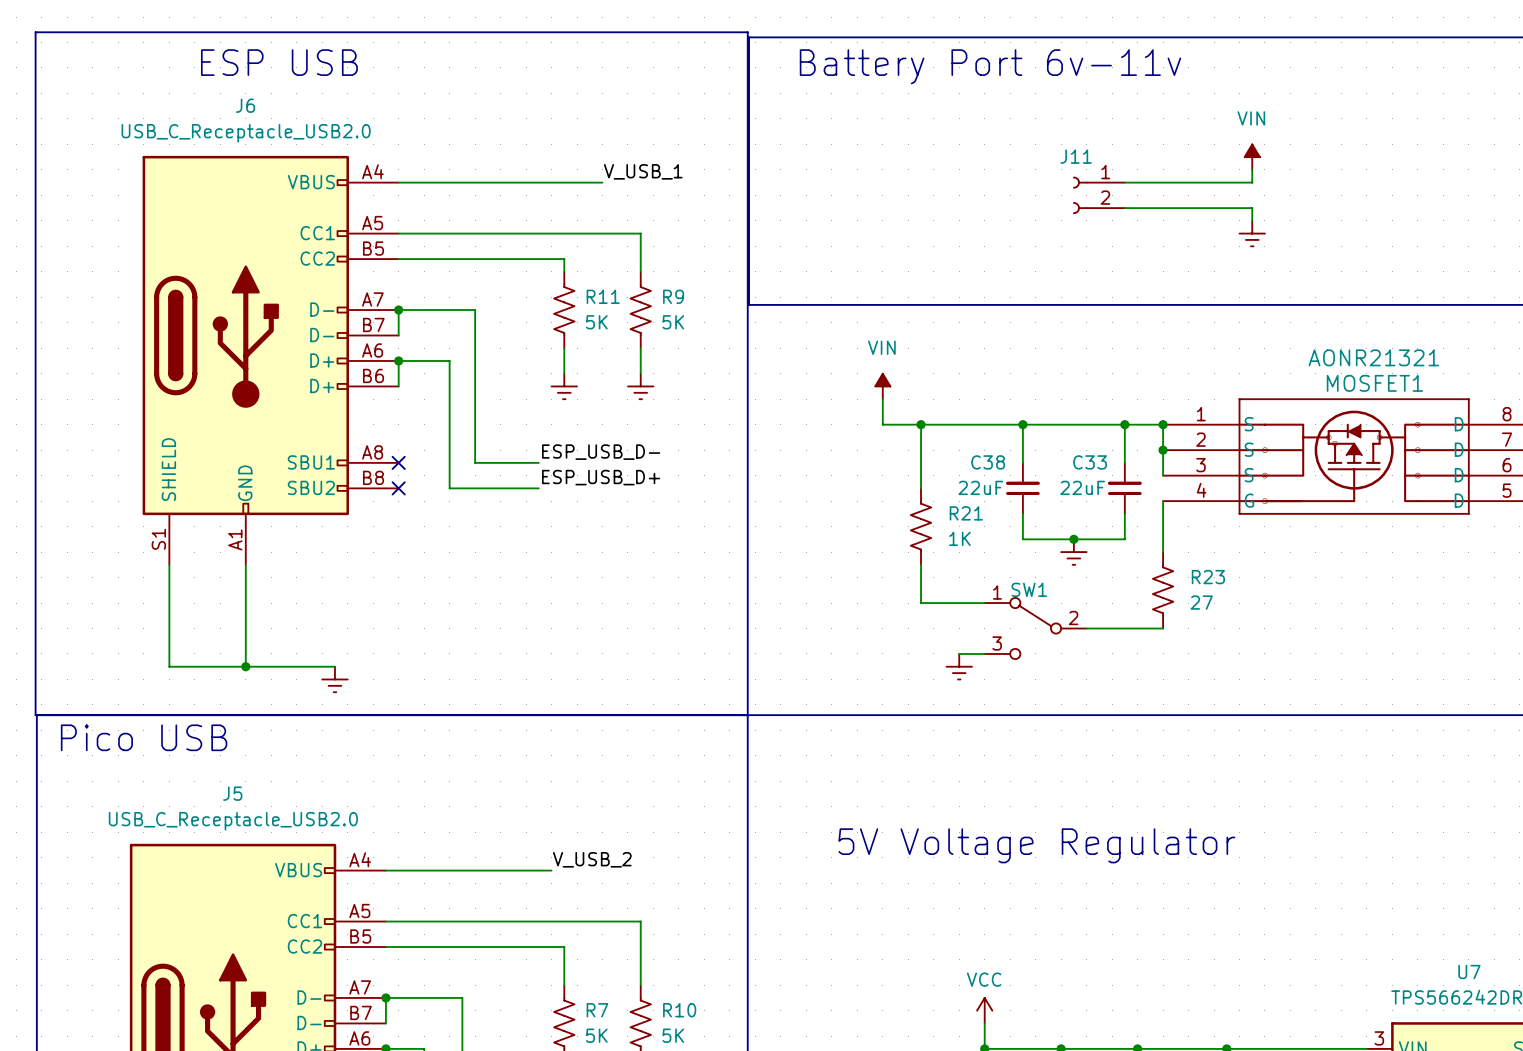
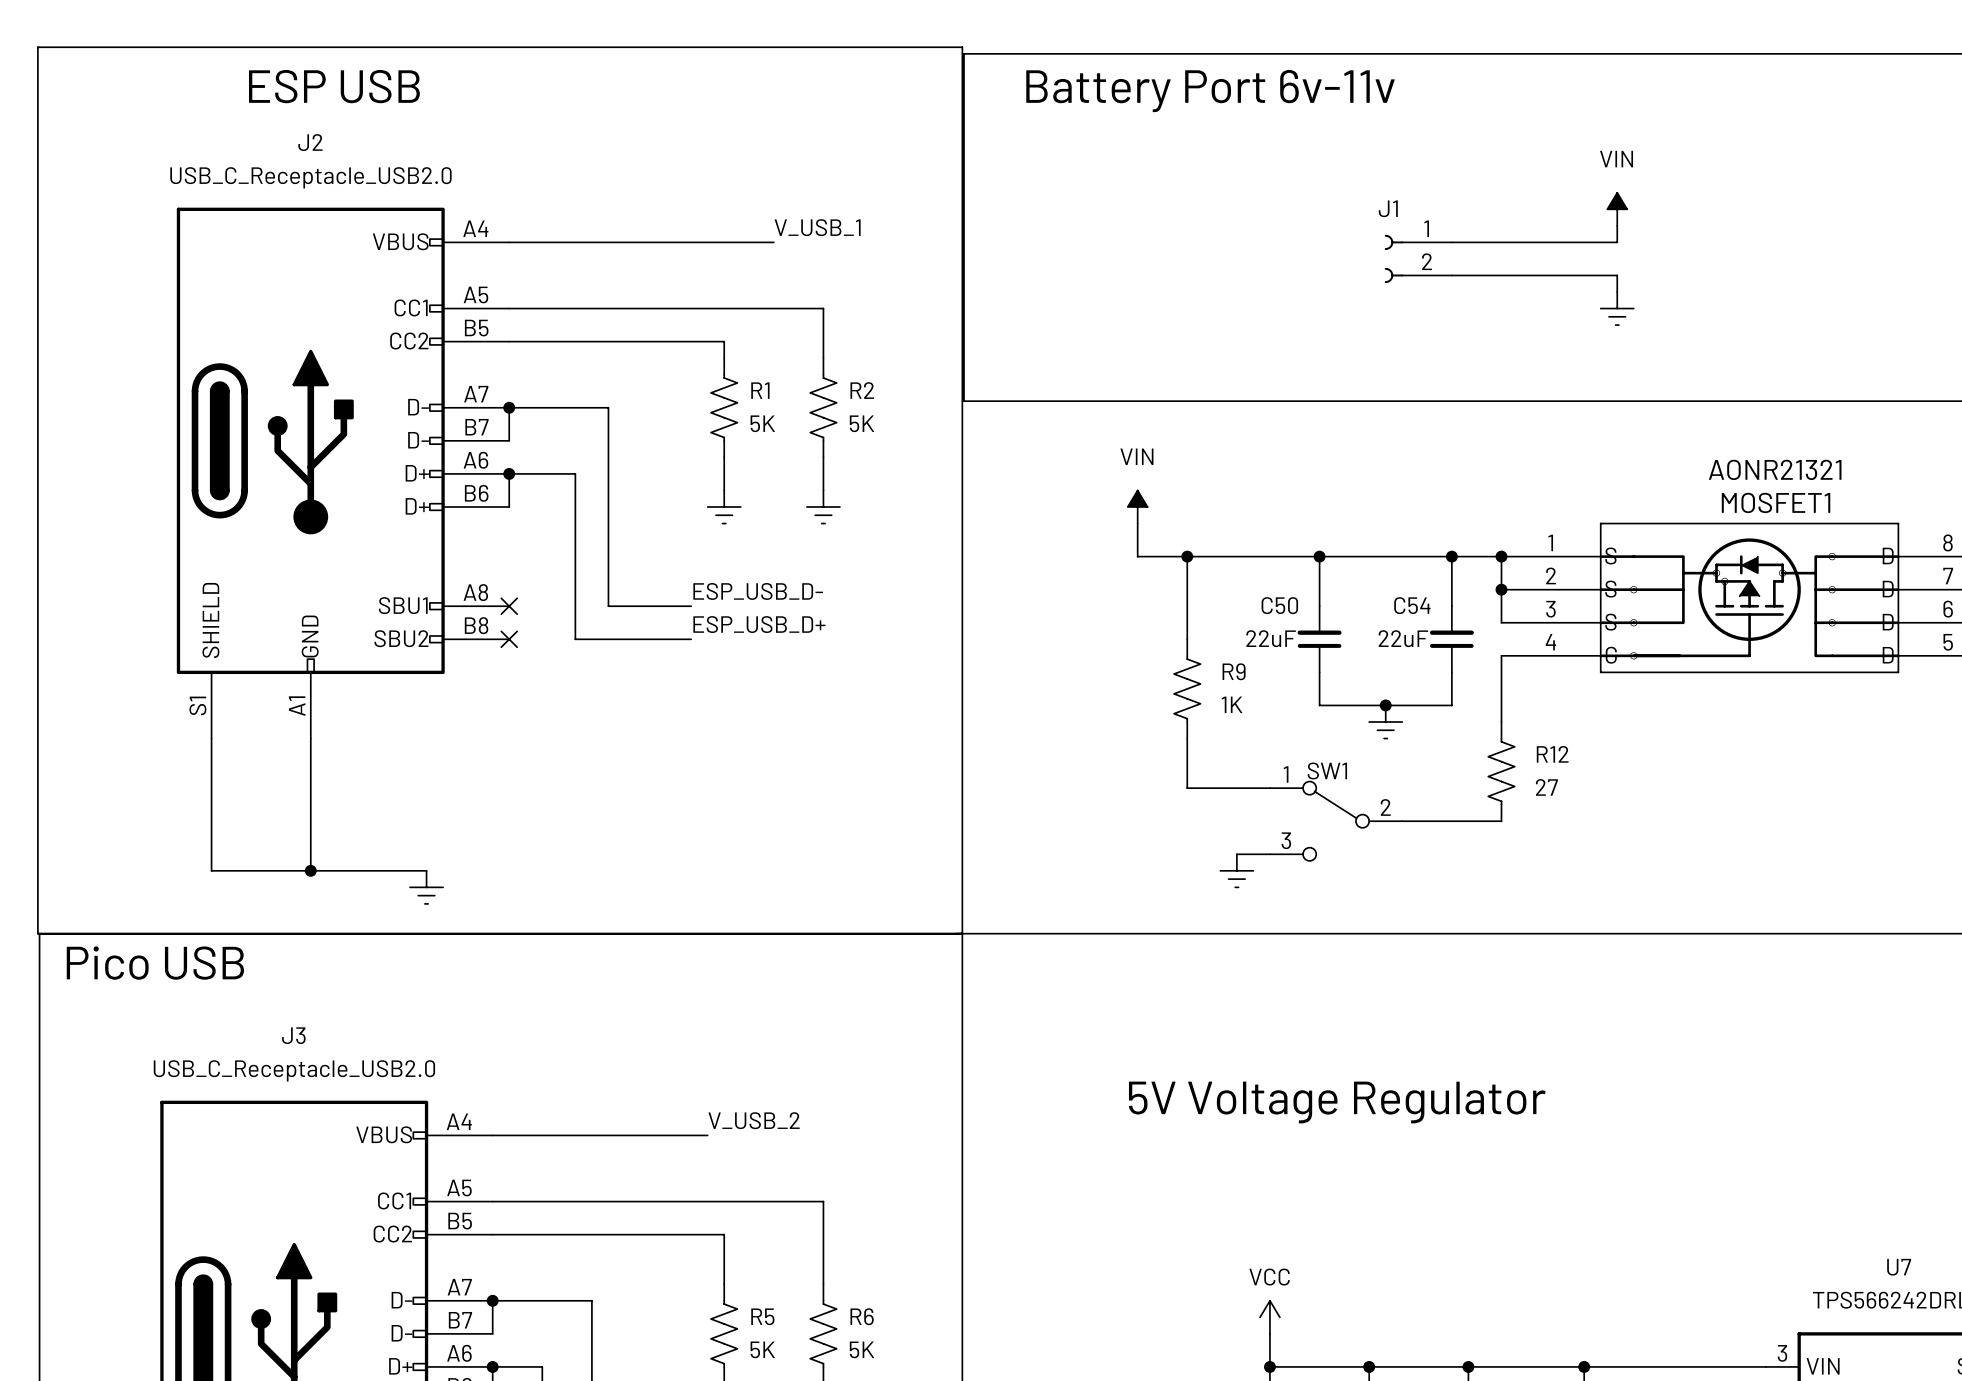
J6 name: J6 (245, 105) -> J2 (310, 142)
J11 name: J11 (1076, 156) -> J1 (1388, 208)
R11 name: R11 (603, 296) -> R1 (760, 390)
R9 name: R9 (673, 296) -> R2 (862, 390)
C38 name: C38 (988, 462) -> C50 (1279, 605)
C33 name: C33 (1090, 462) -> C54 (1412, 605)
R21 name: R21 (966, 513) -> R9 (1234, 671)
R23 name: R23 (1208, 577) -> R12 (1552, 754)
J5 name: J5 (232, 793) -> J3 (293, 1035)
R7 name: R7 (597, 1010) -> R5 (762, 1316)
R10 name: R10 (679, 1010) -> R6 (862, 1316)

